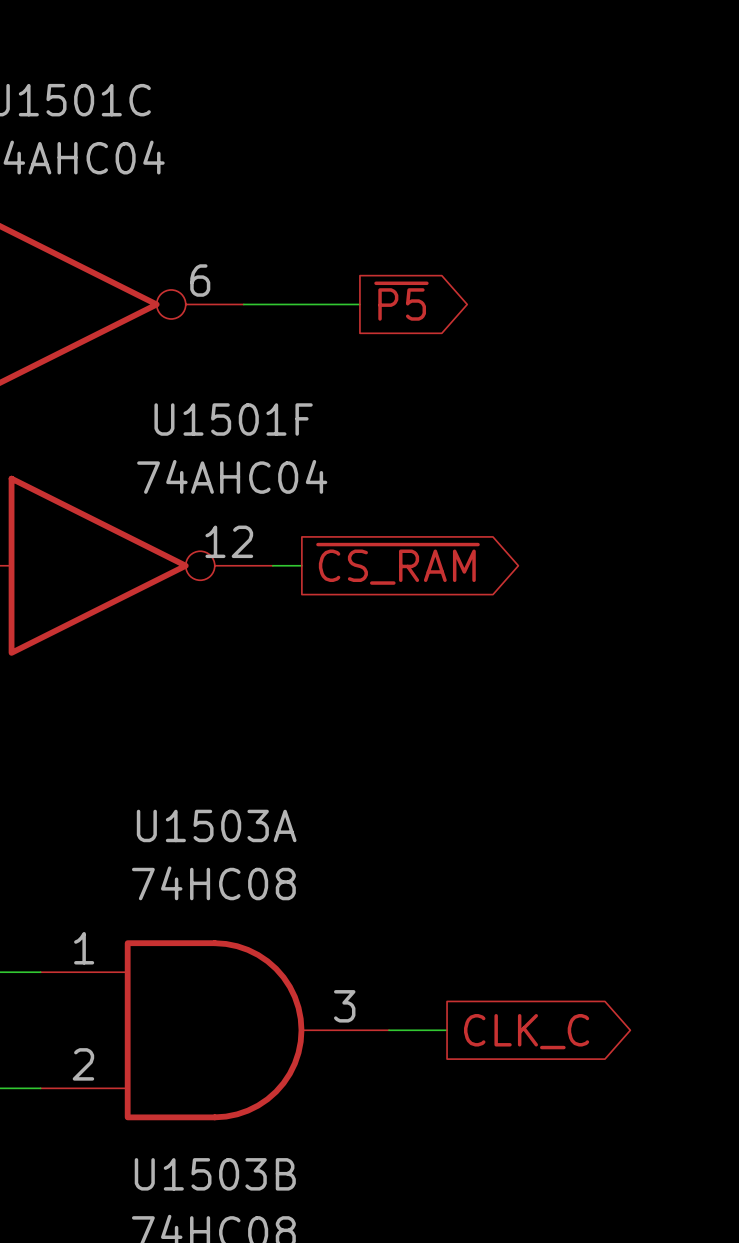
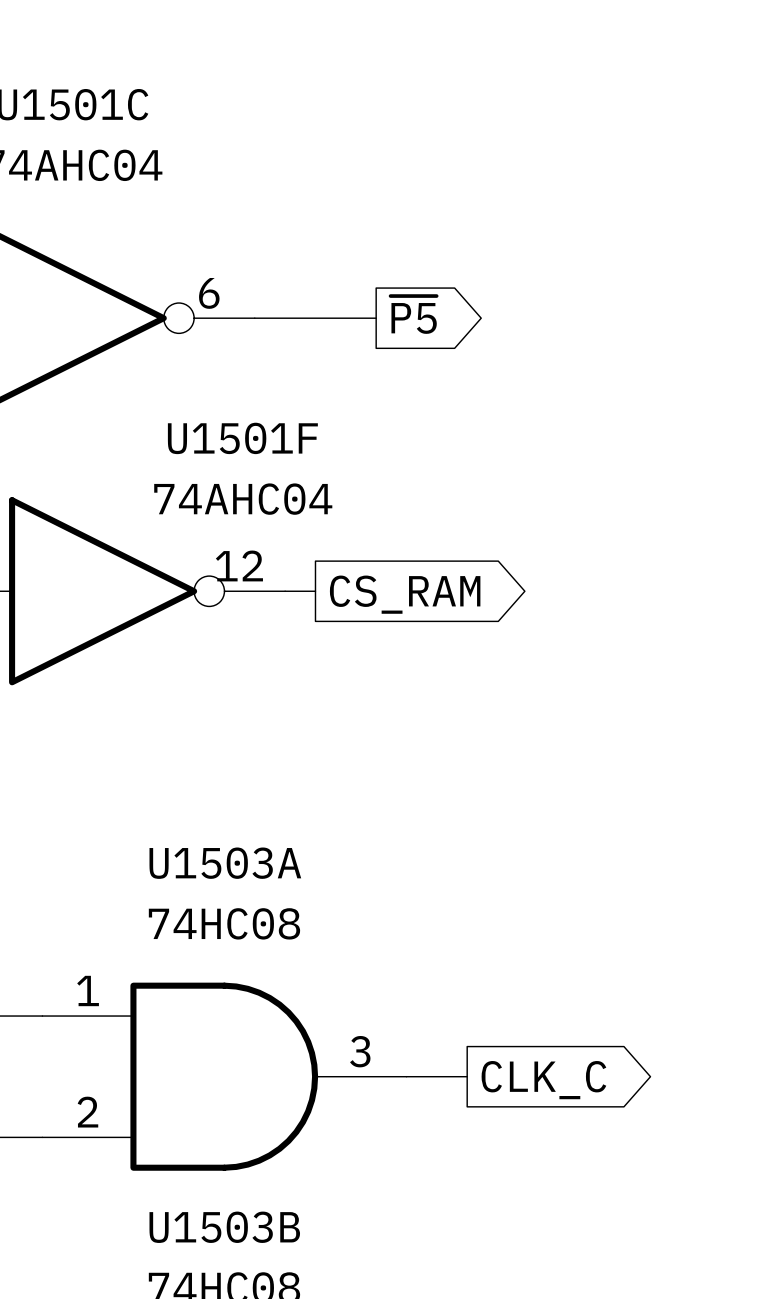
global label: ~{CS_RAM} (398, 563) -> CS_RAM (405, 594)

